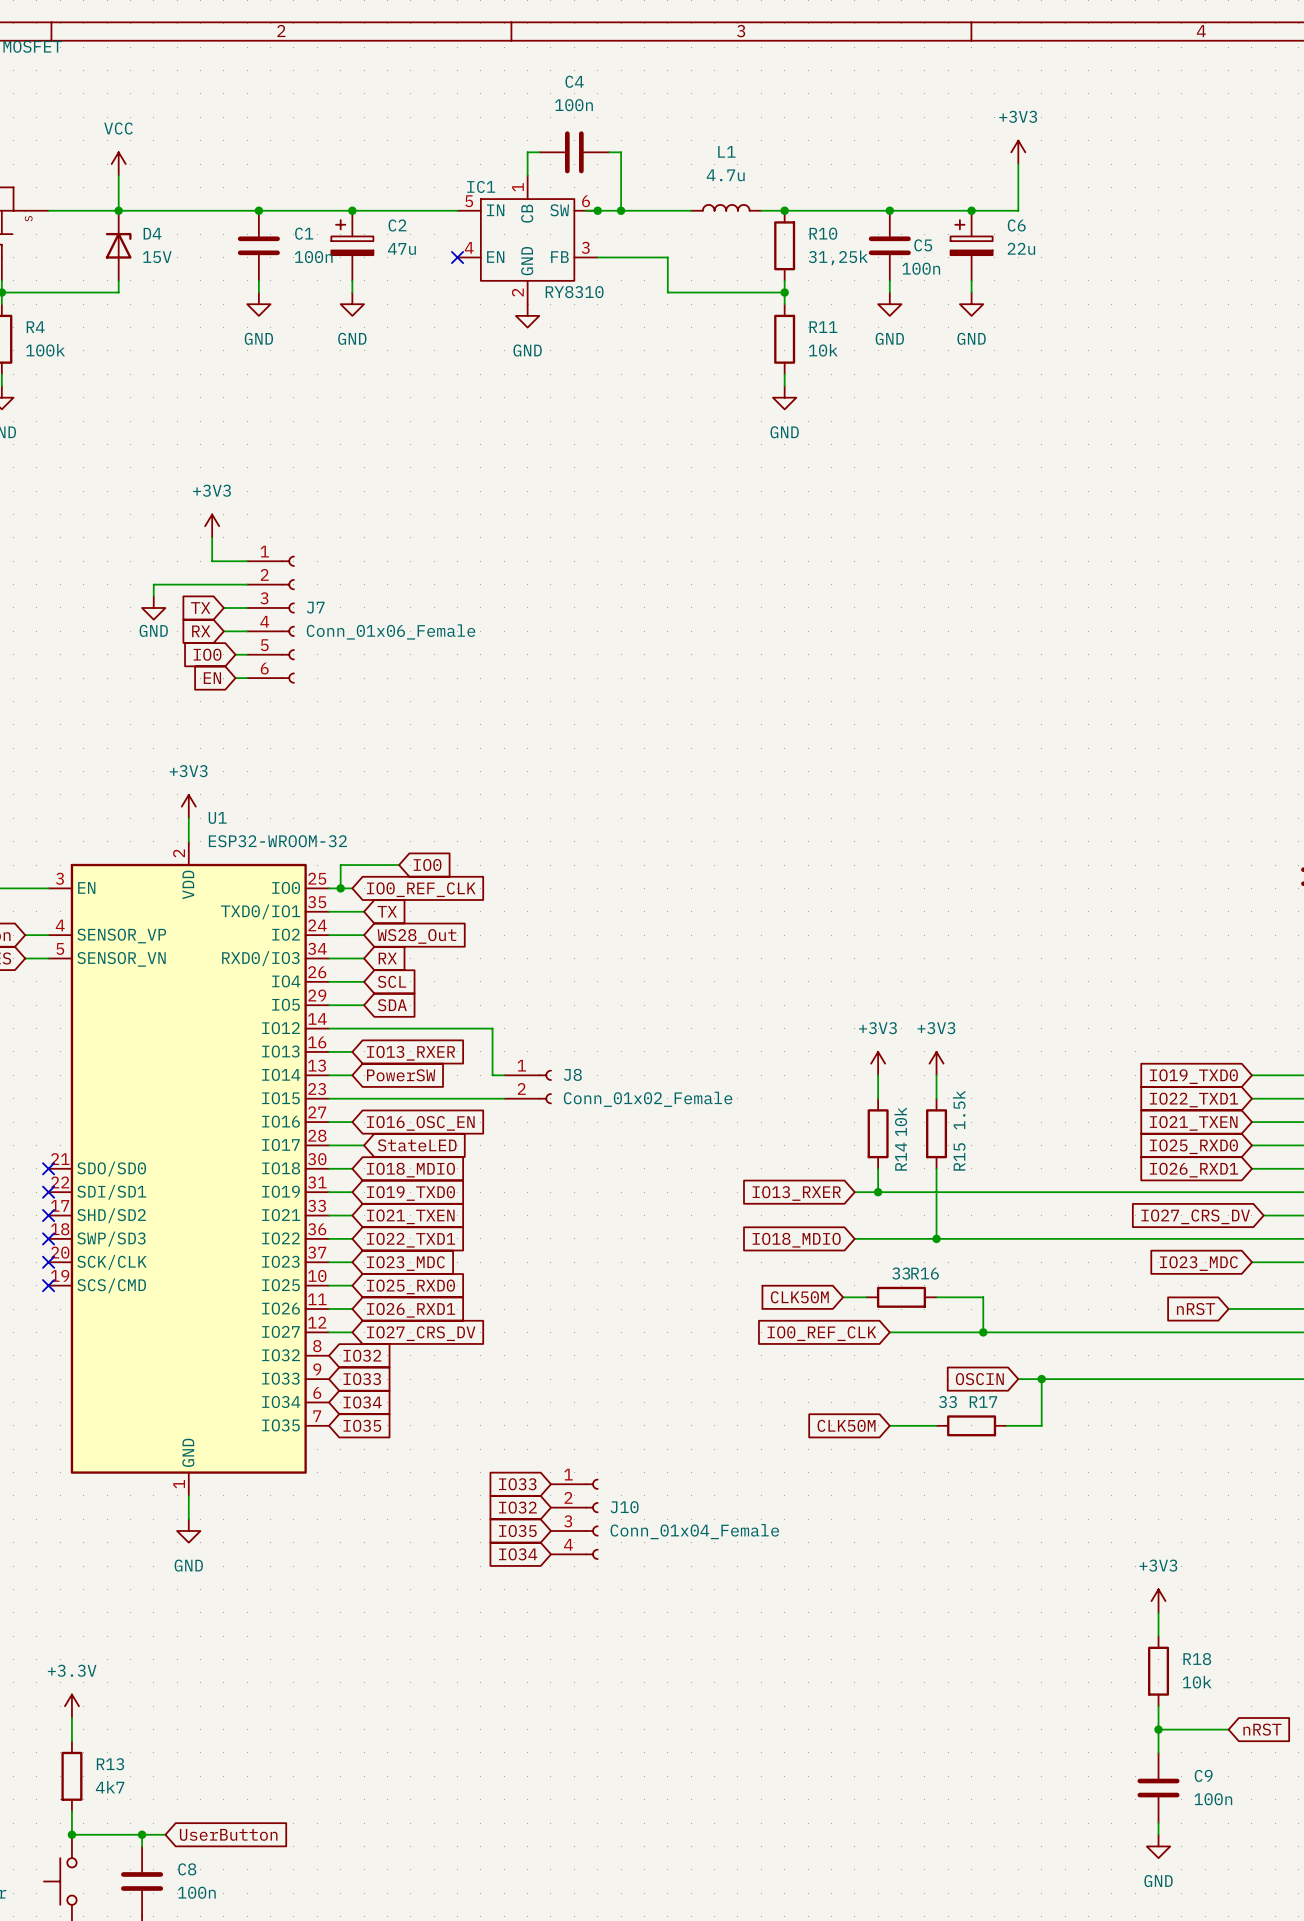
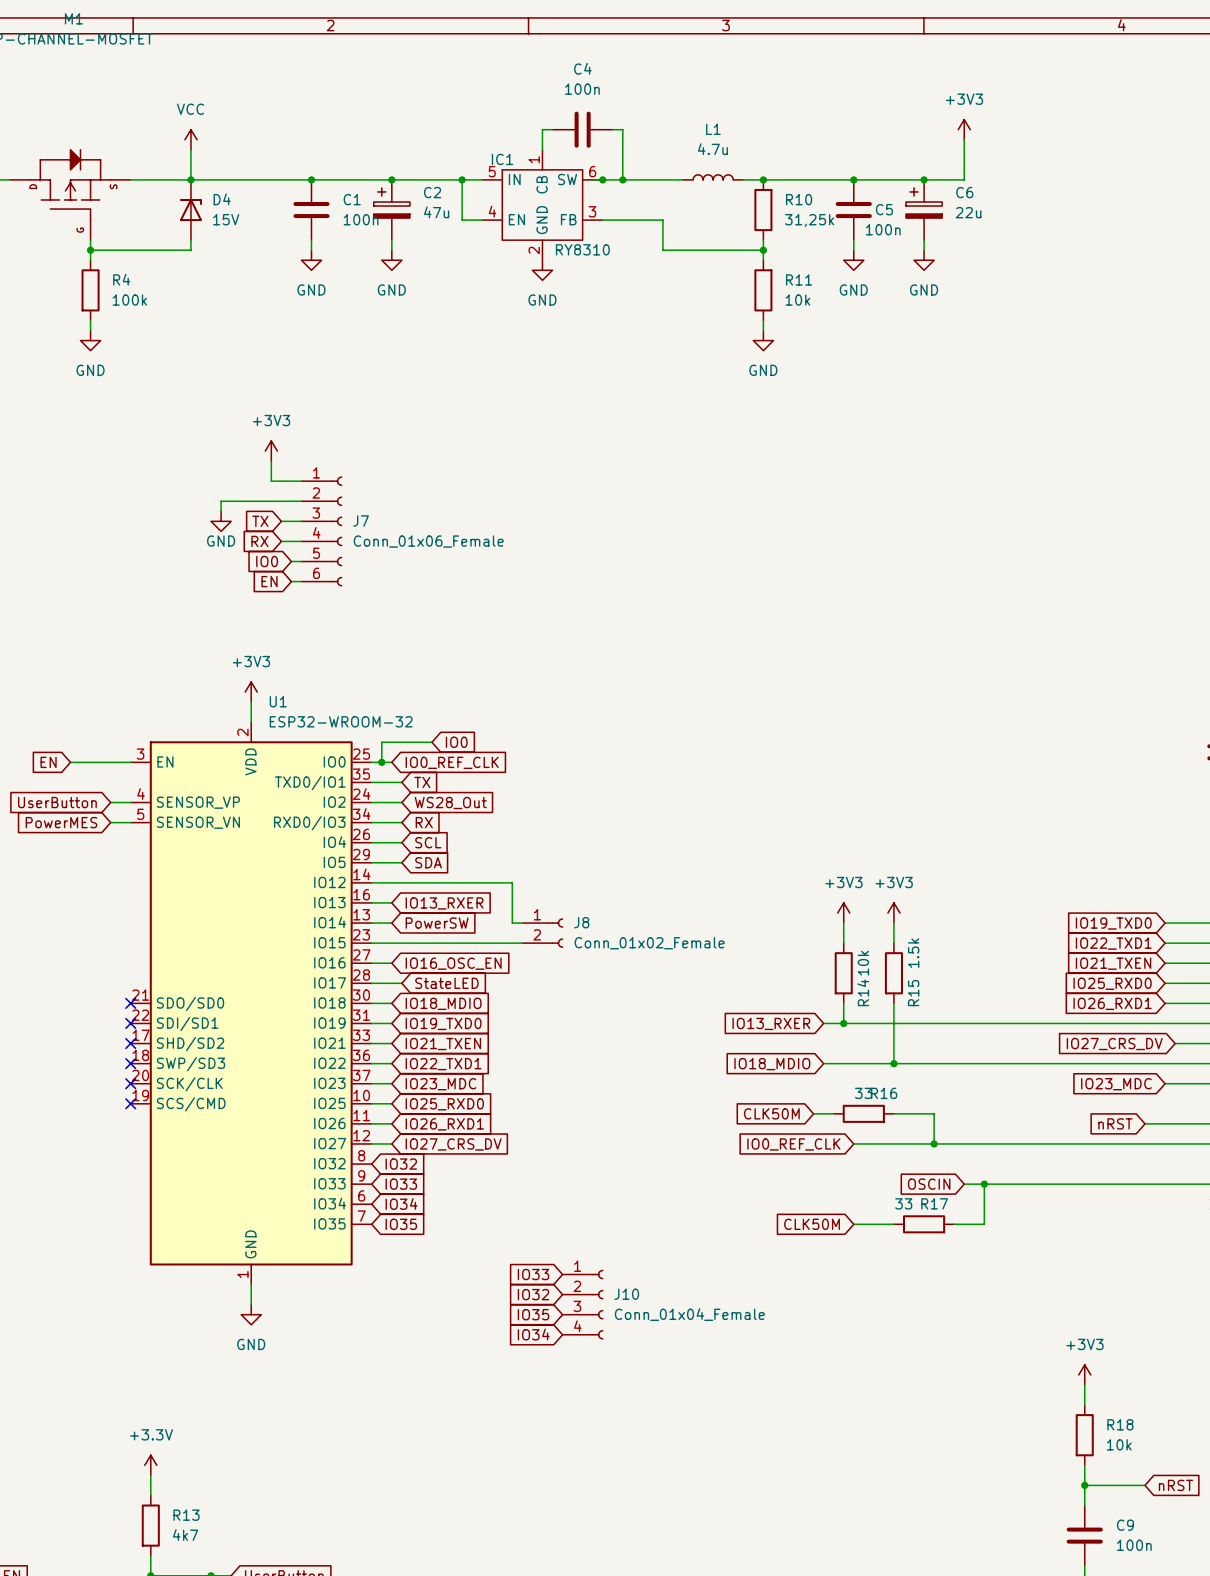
wire: none -> (462, 179) (462, 220) (482, 220)
junction: none -> (462, 179)
no-connect mark: (457, 257) -> none

